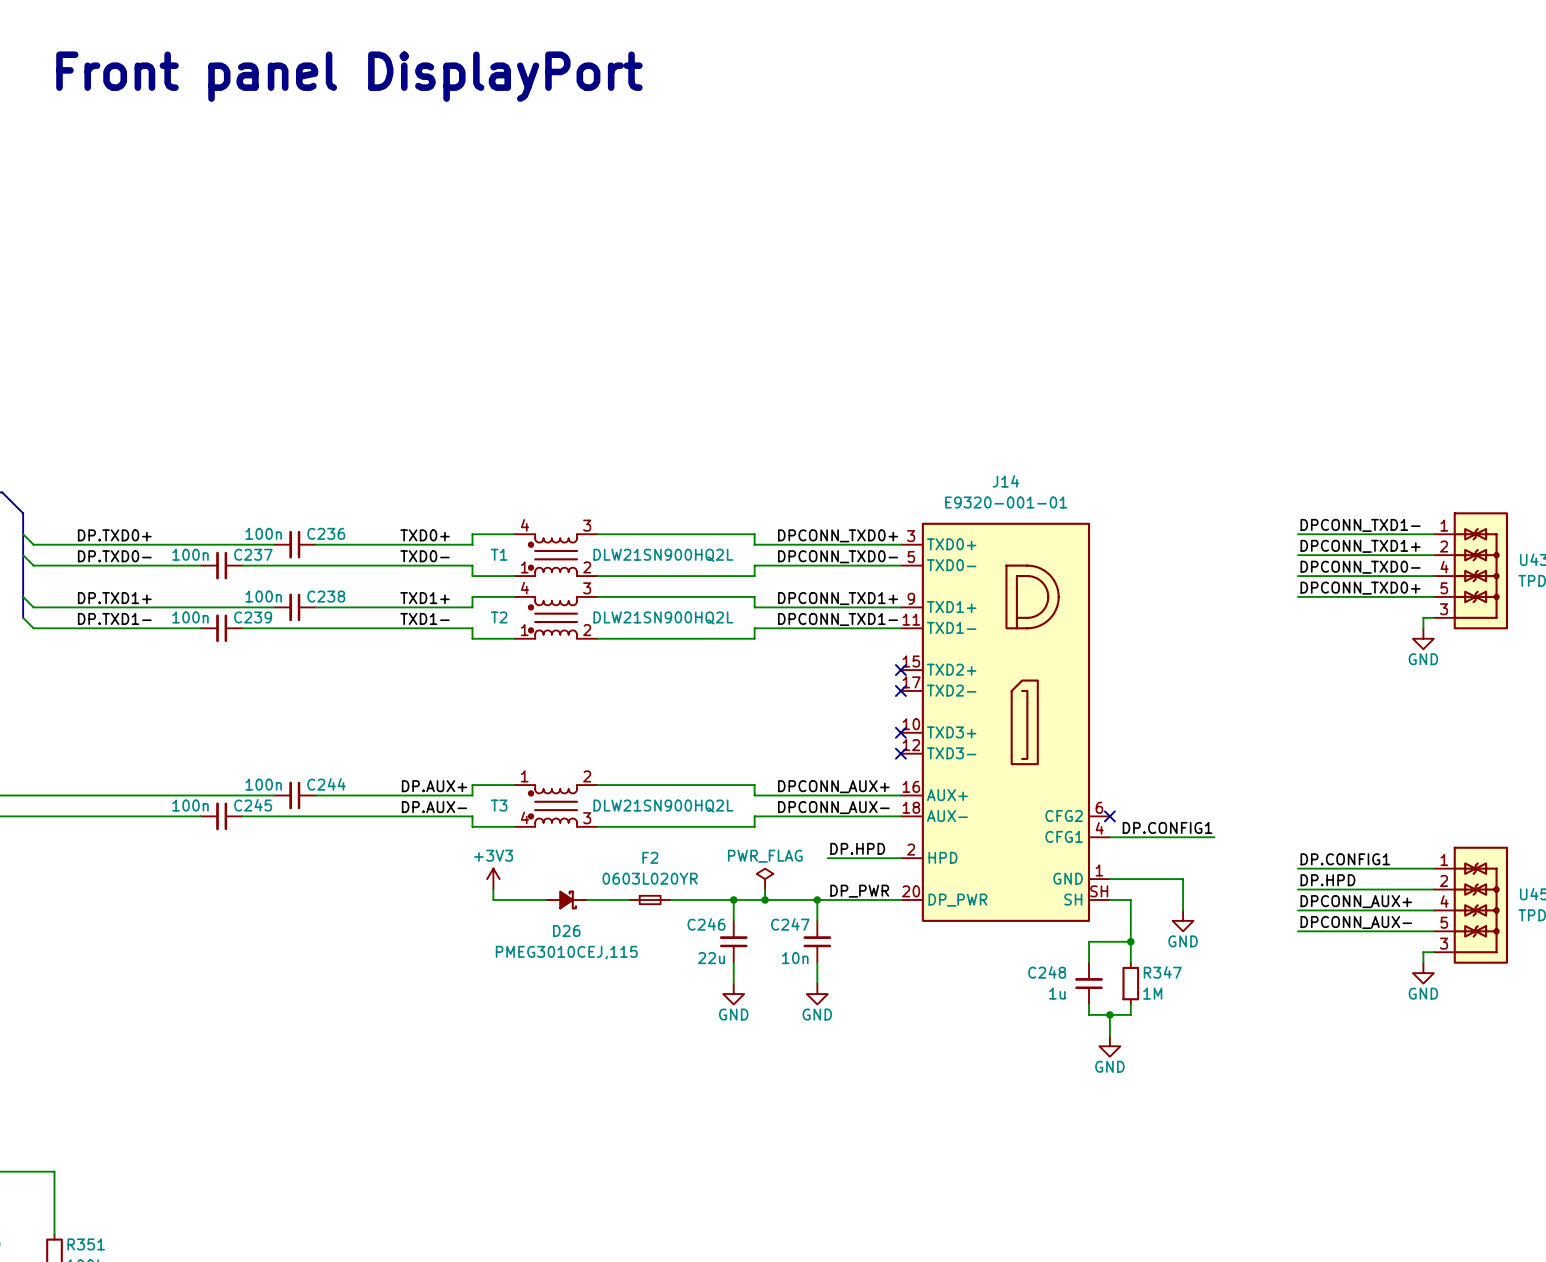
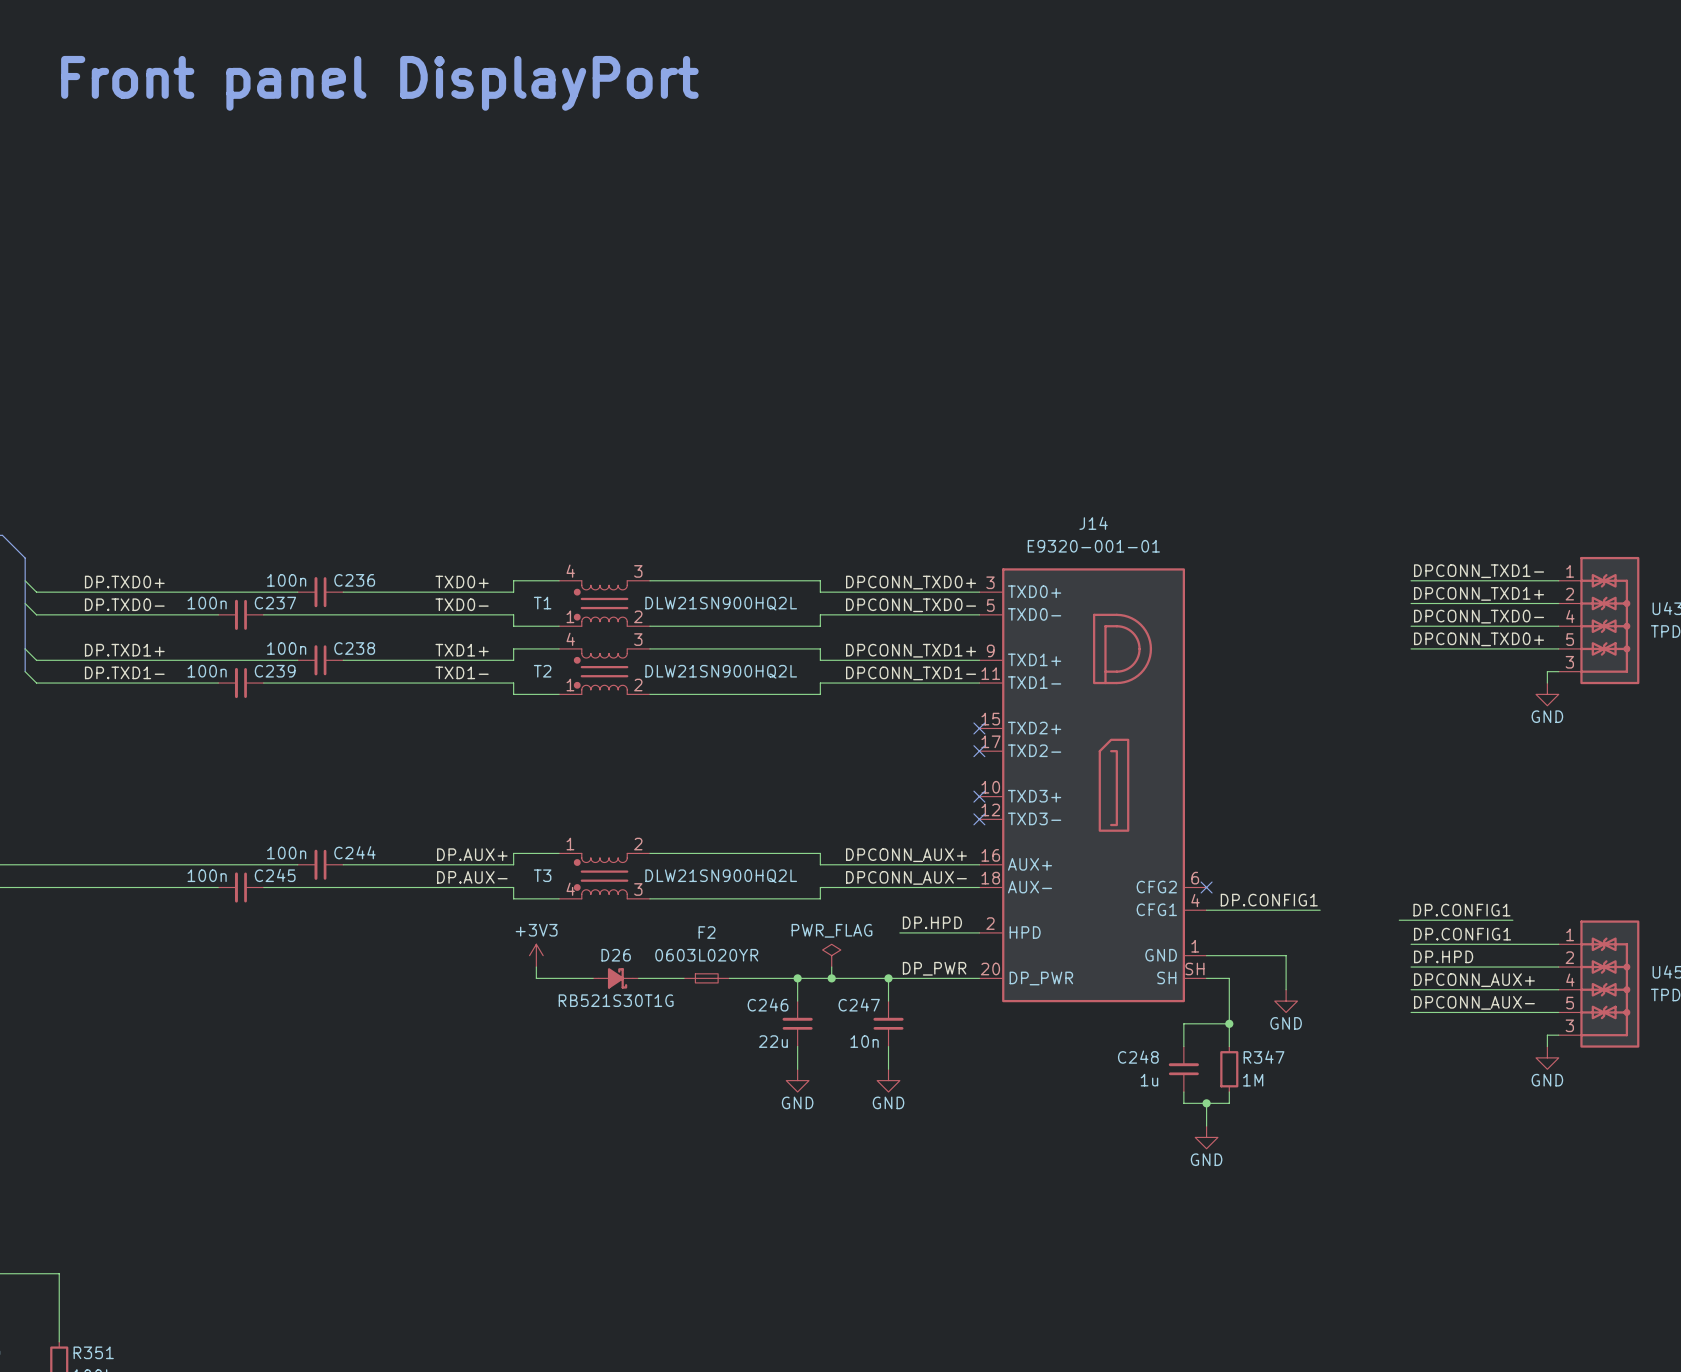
label: none -> DP.CONFIG1 (1461, 910)
wire: none -> (1399, 920) (1512, 920)
D26 name position: D26 (566, 930) -> D26 (616, 955)
D26 text: PMEG3010CEJ,115 (566, 952) -> RB521S30T1G (616, 1000)

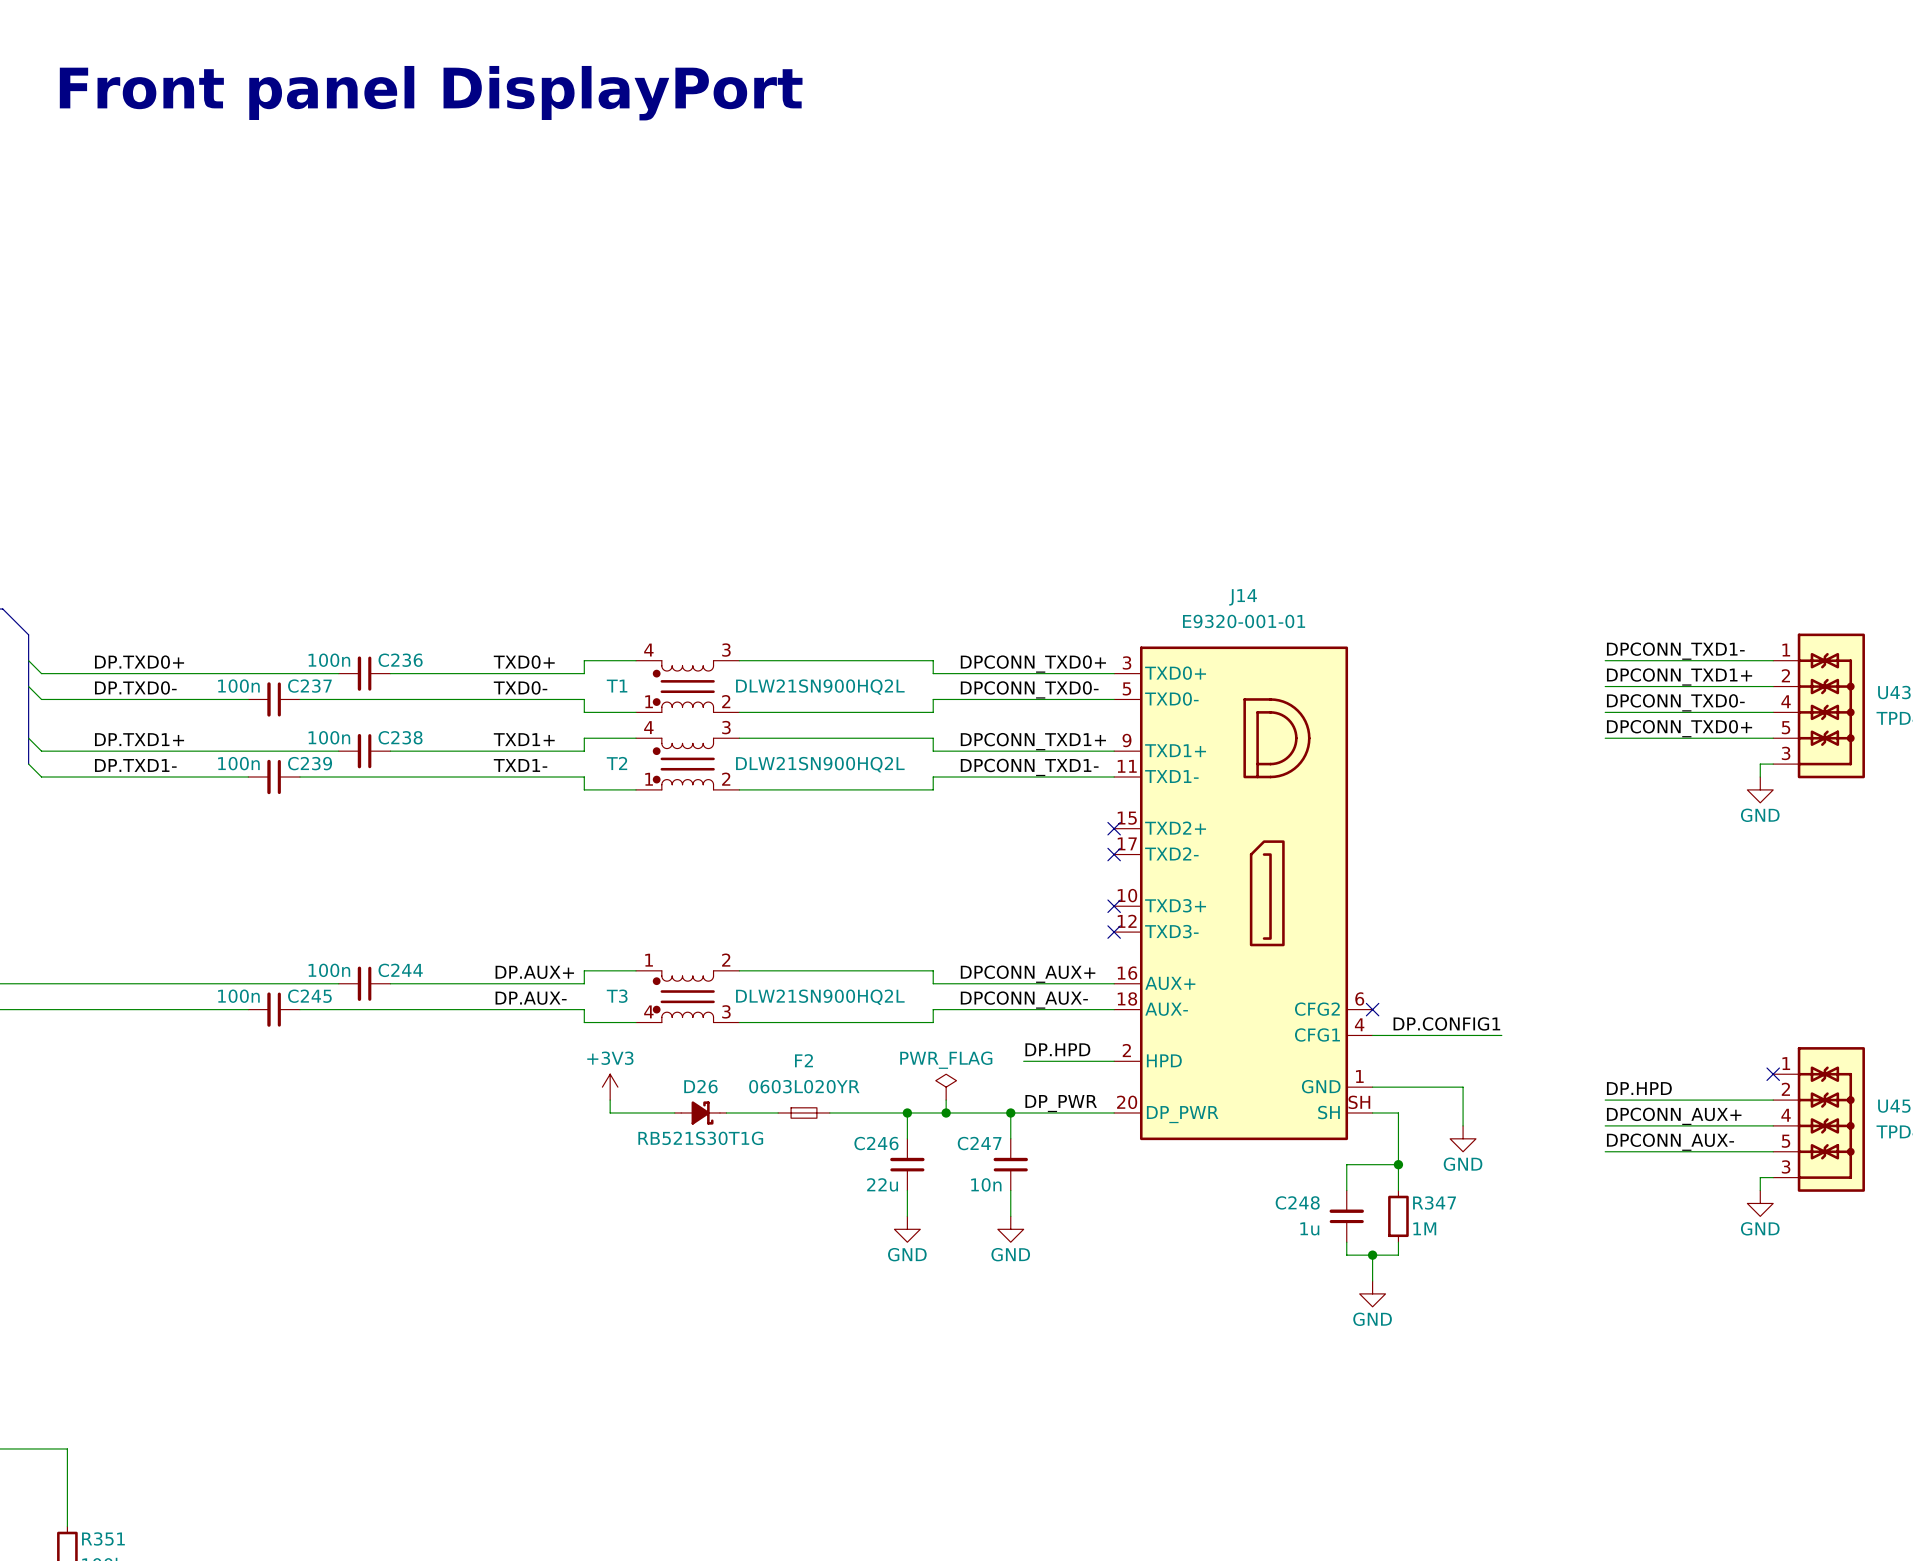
label: DP.CONFIG1 (1461, 910) -> none
wire: (1399, 920) (1512, 920) -> none
label: DP.CONFIG1 (1462, 934) -> none
wire: (1411, 944) (1558, 944) -> none
no-connect mark: none -> (1773, 1074)

